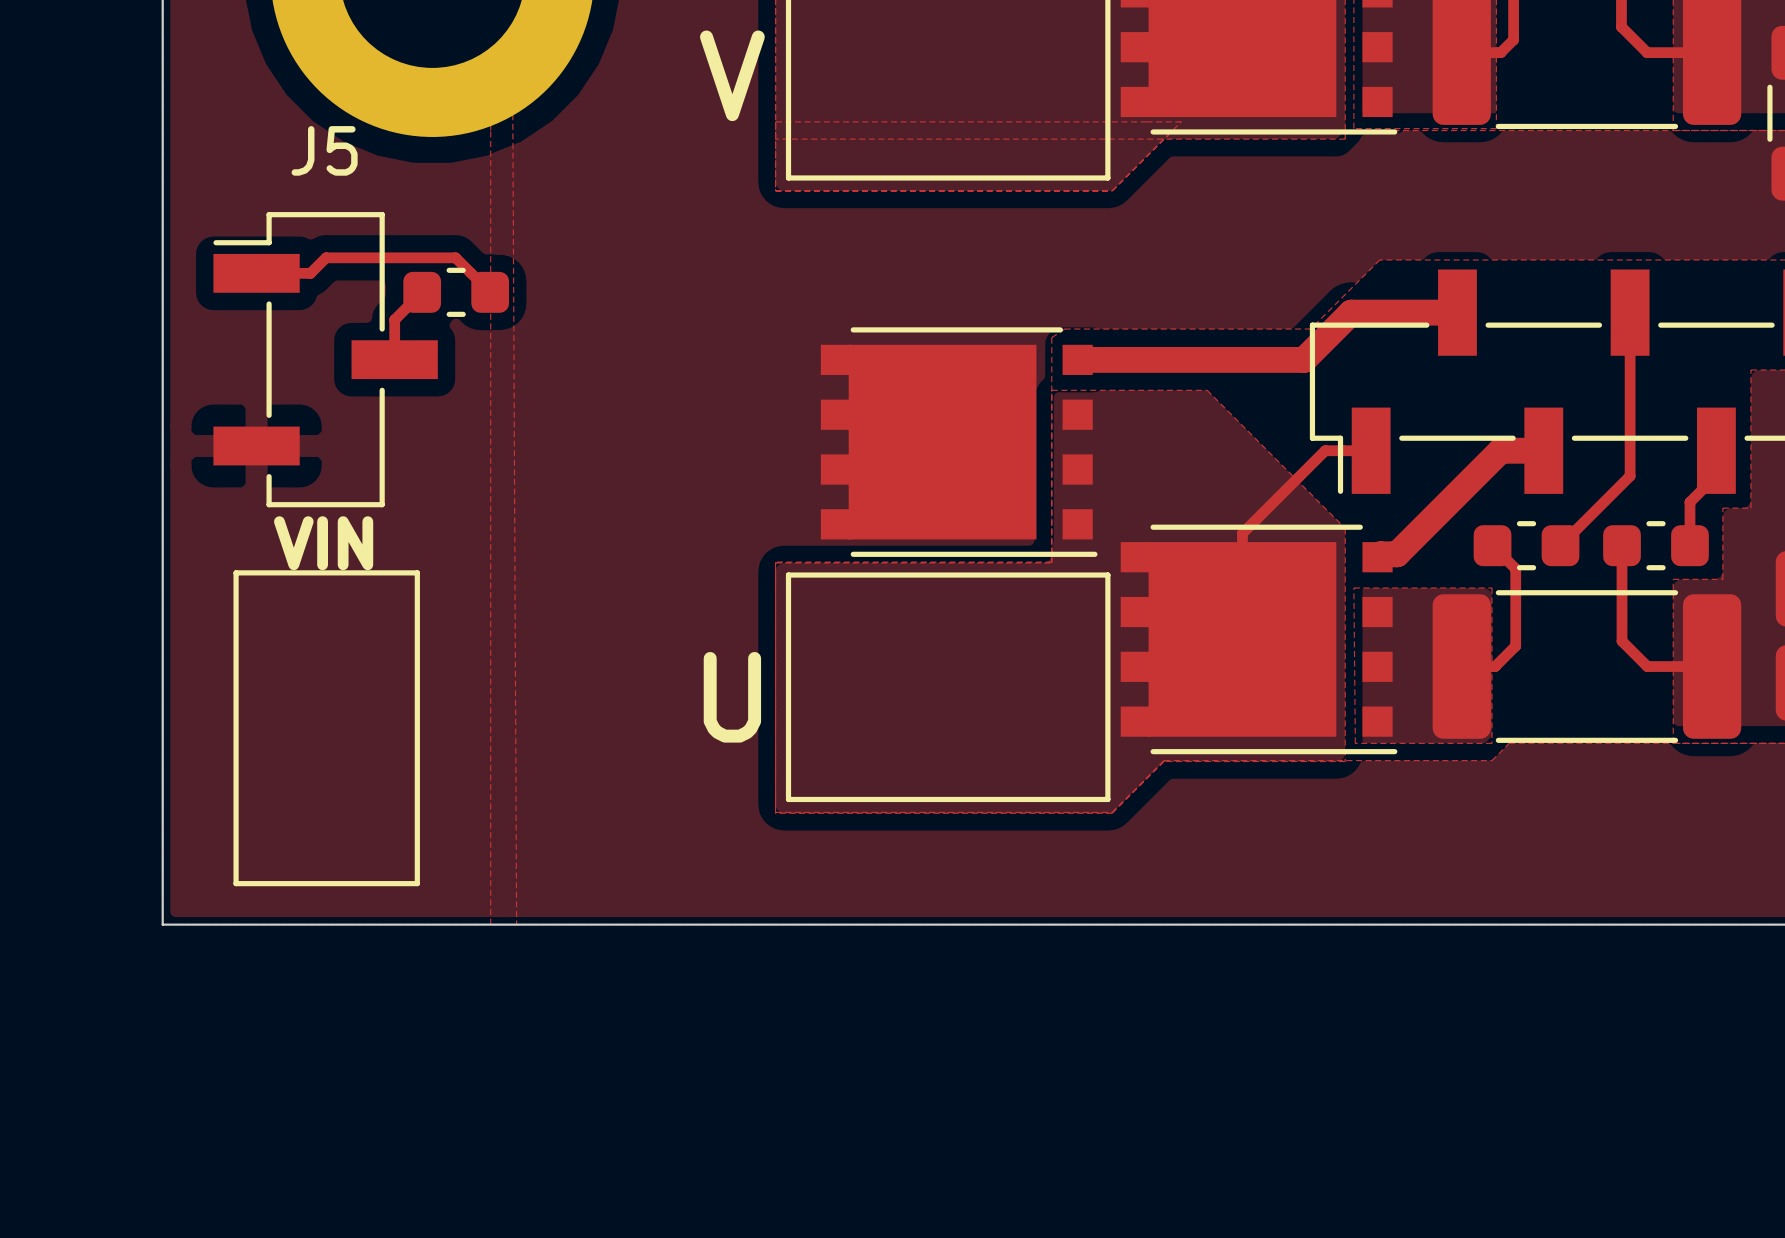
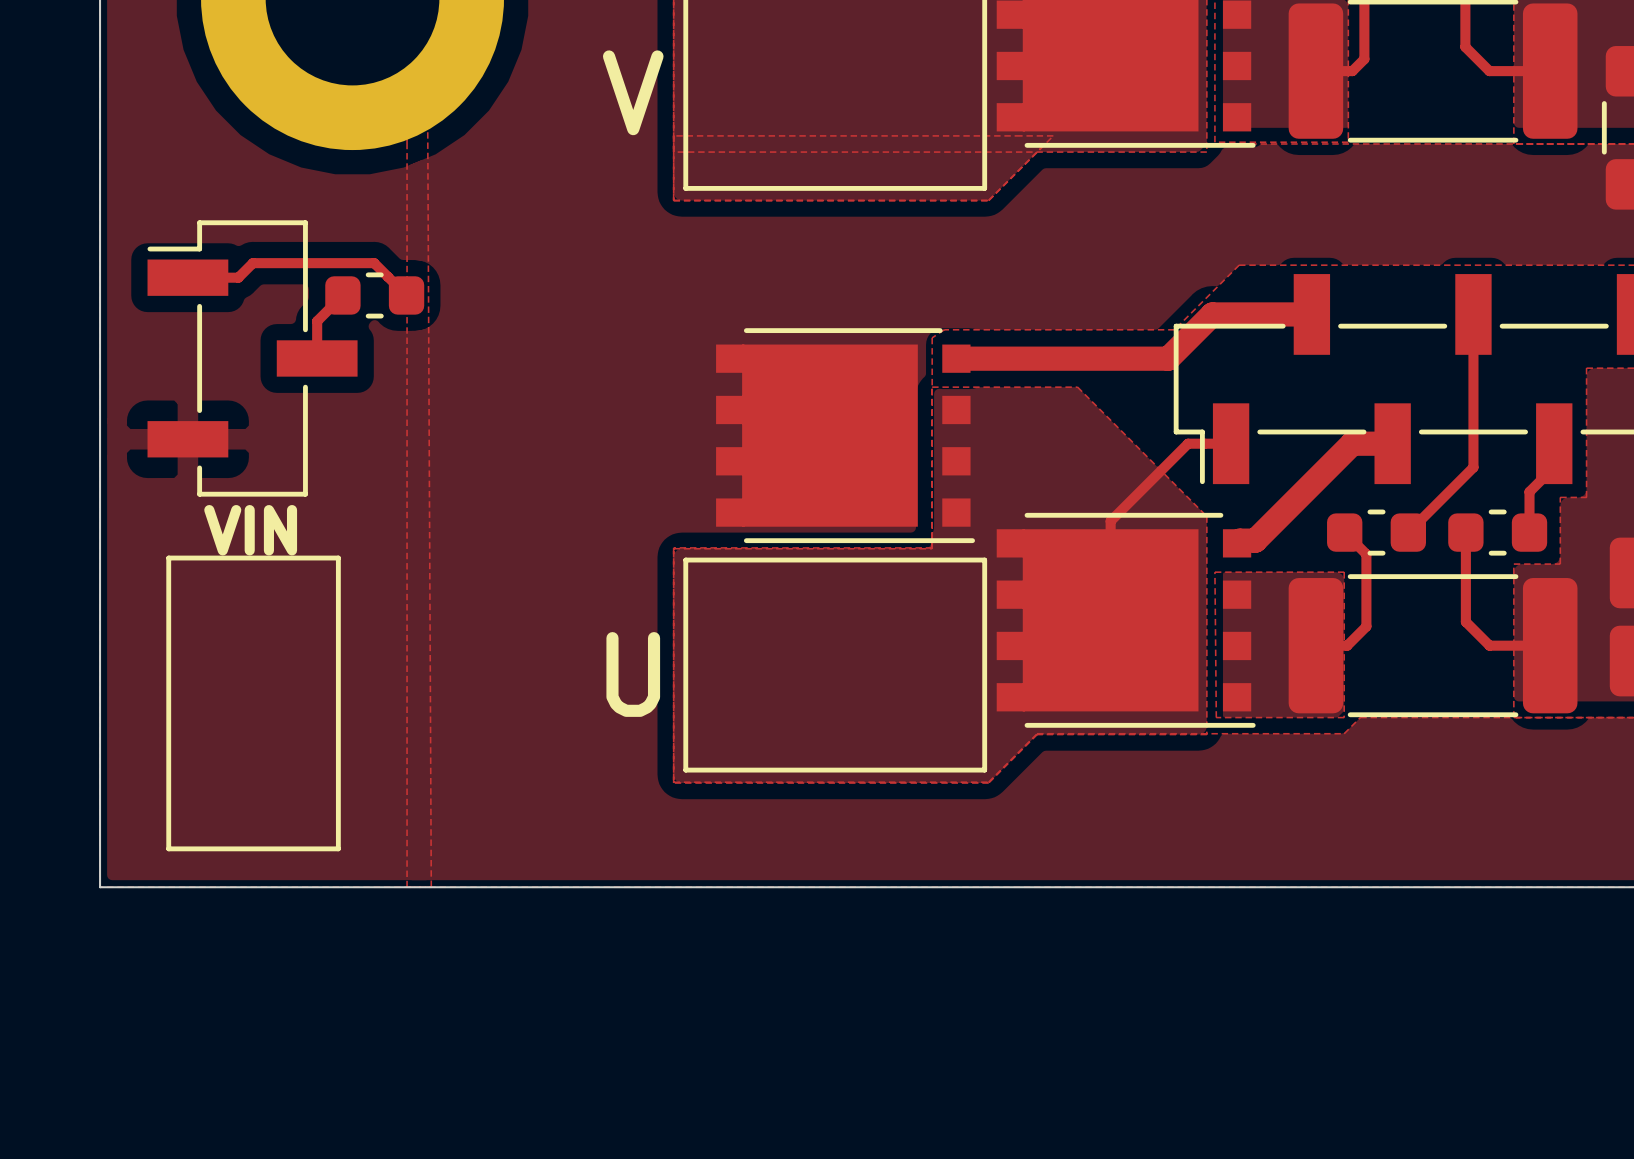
J5 name: J5 (324, 150) -> none

